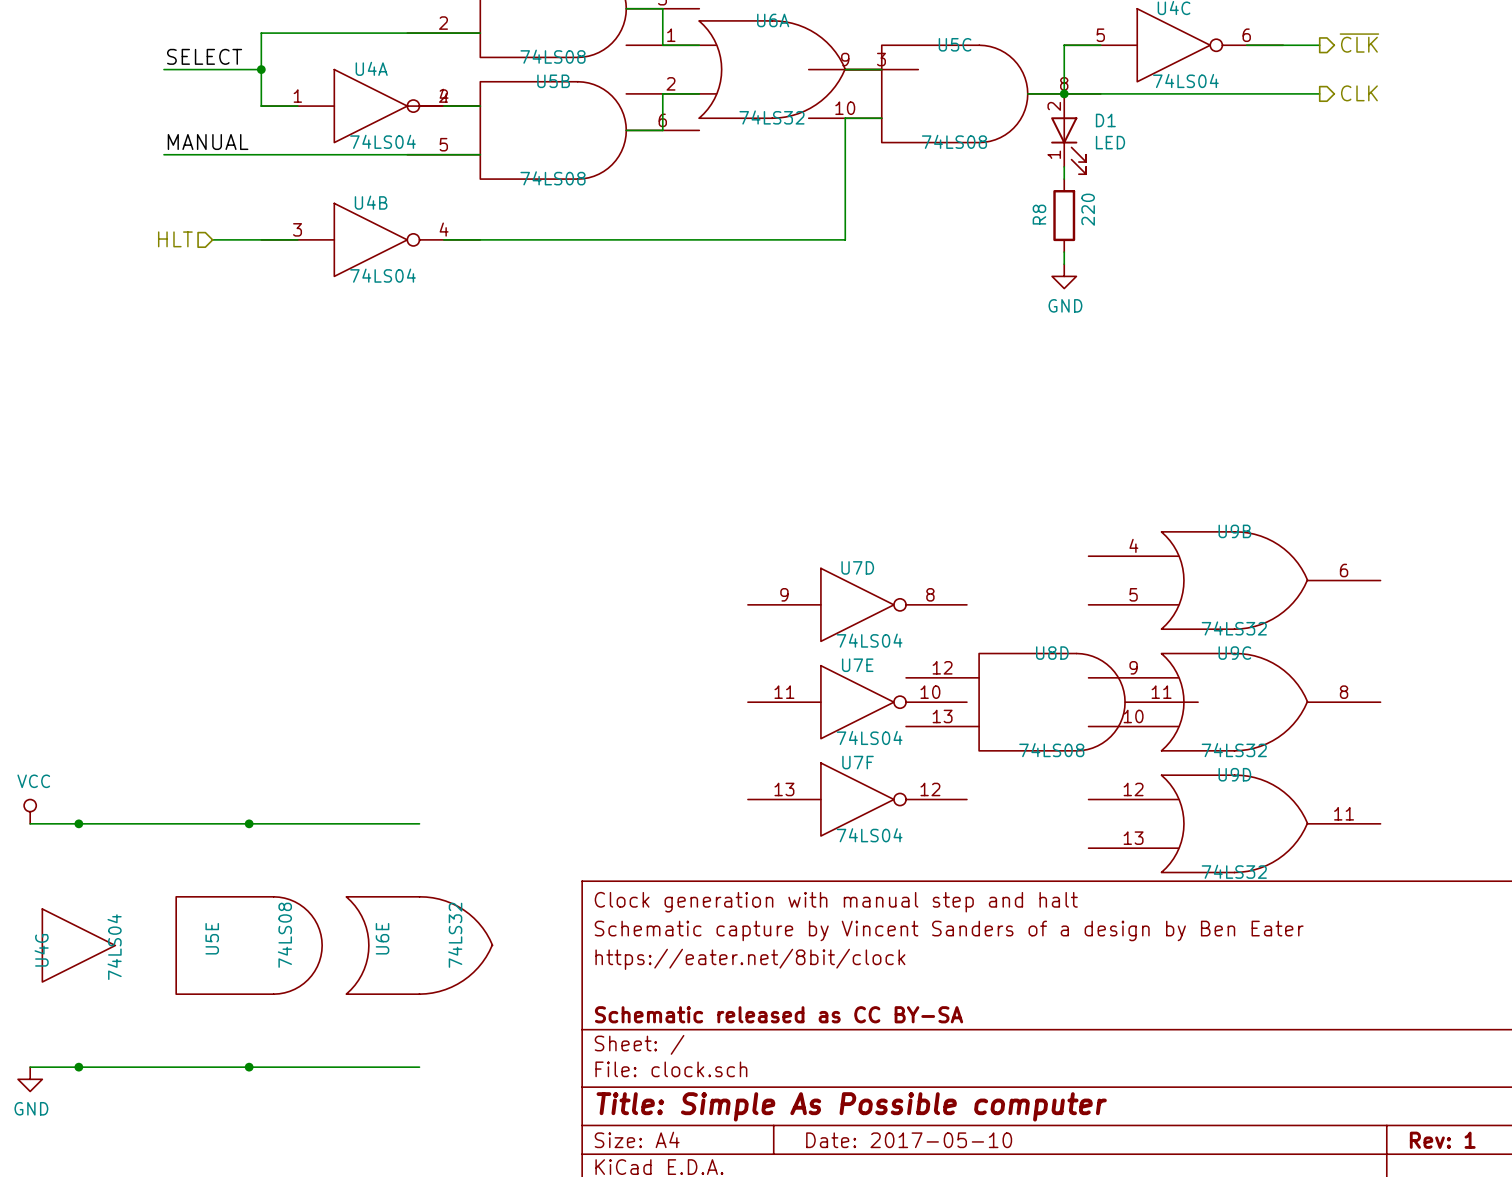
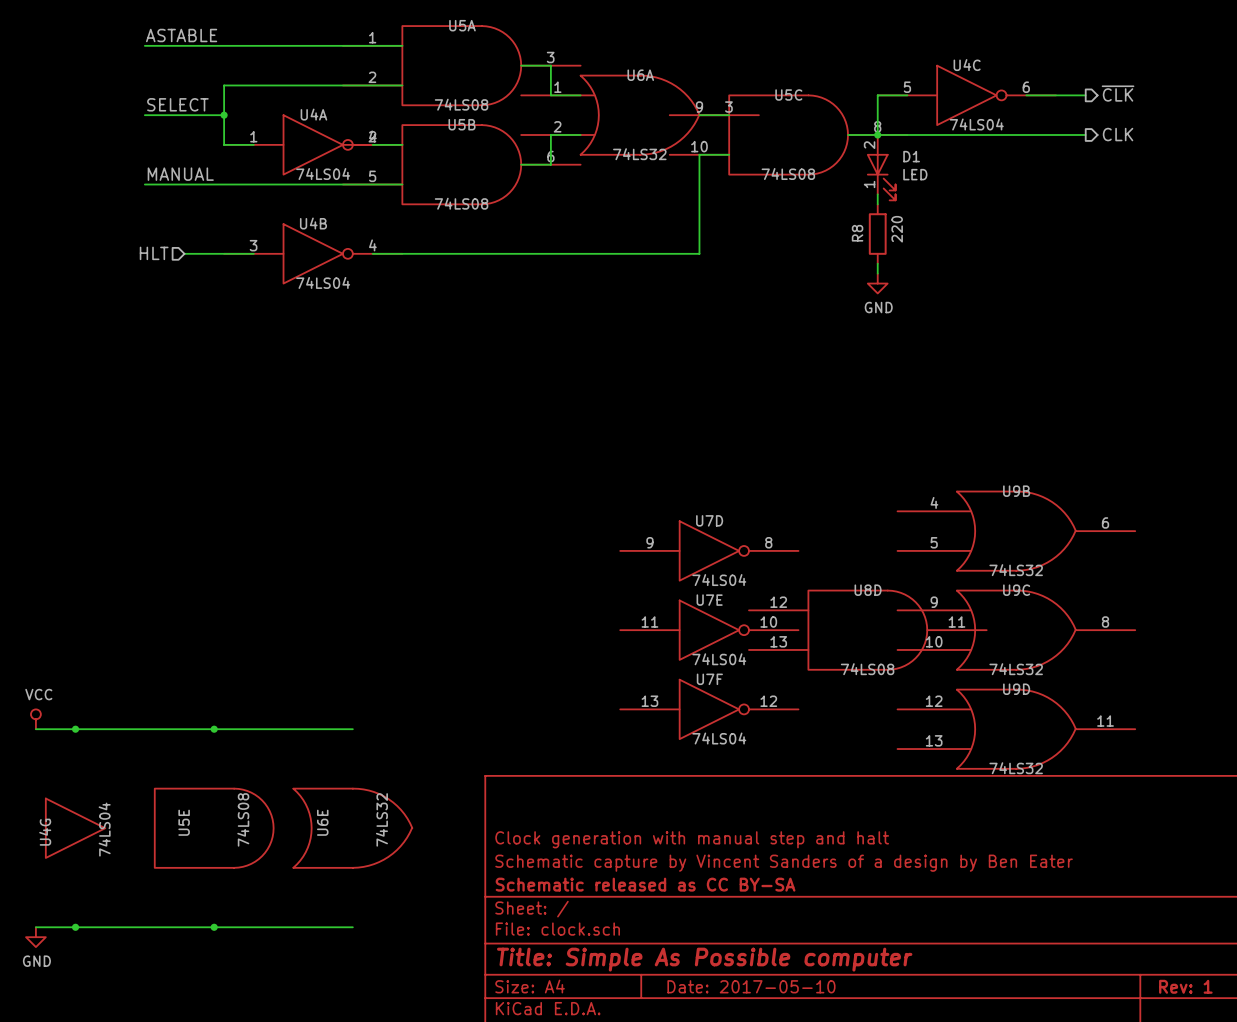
title block: Clock generation with manual step and halt (836, 902) -> none
title block position: Schematic capture by Vincent Sanders of a design by Ben Eater (949, 930) -> Schematic capture by Vincent Sanders of a design by Ben Eater (784, 863)
title block: https://eater.net/8bit/clock (750, 959) -> Clock generation with manual step and halt (692, 839)

